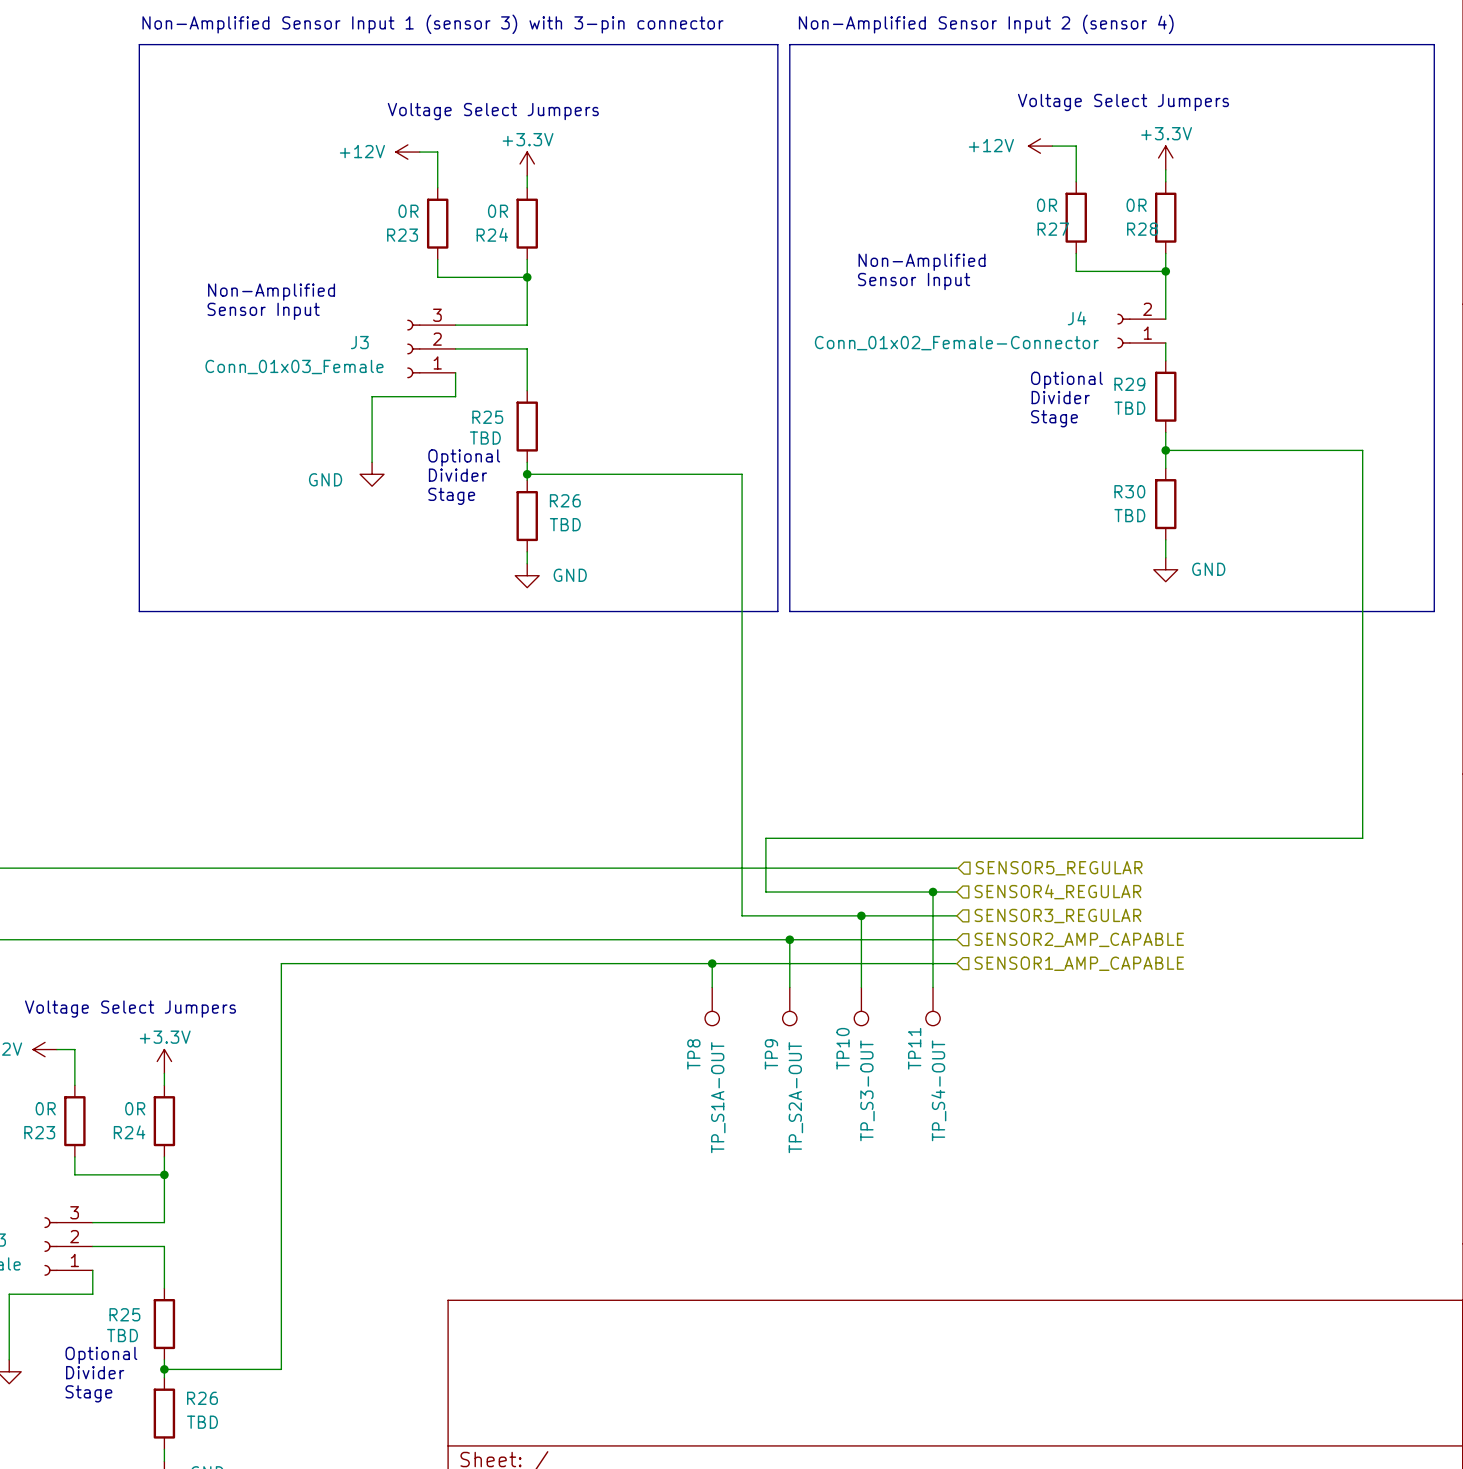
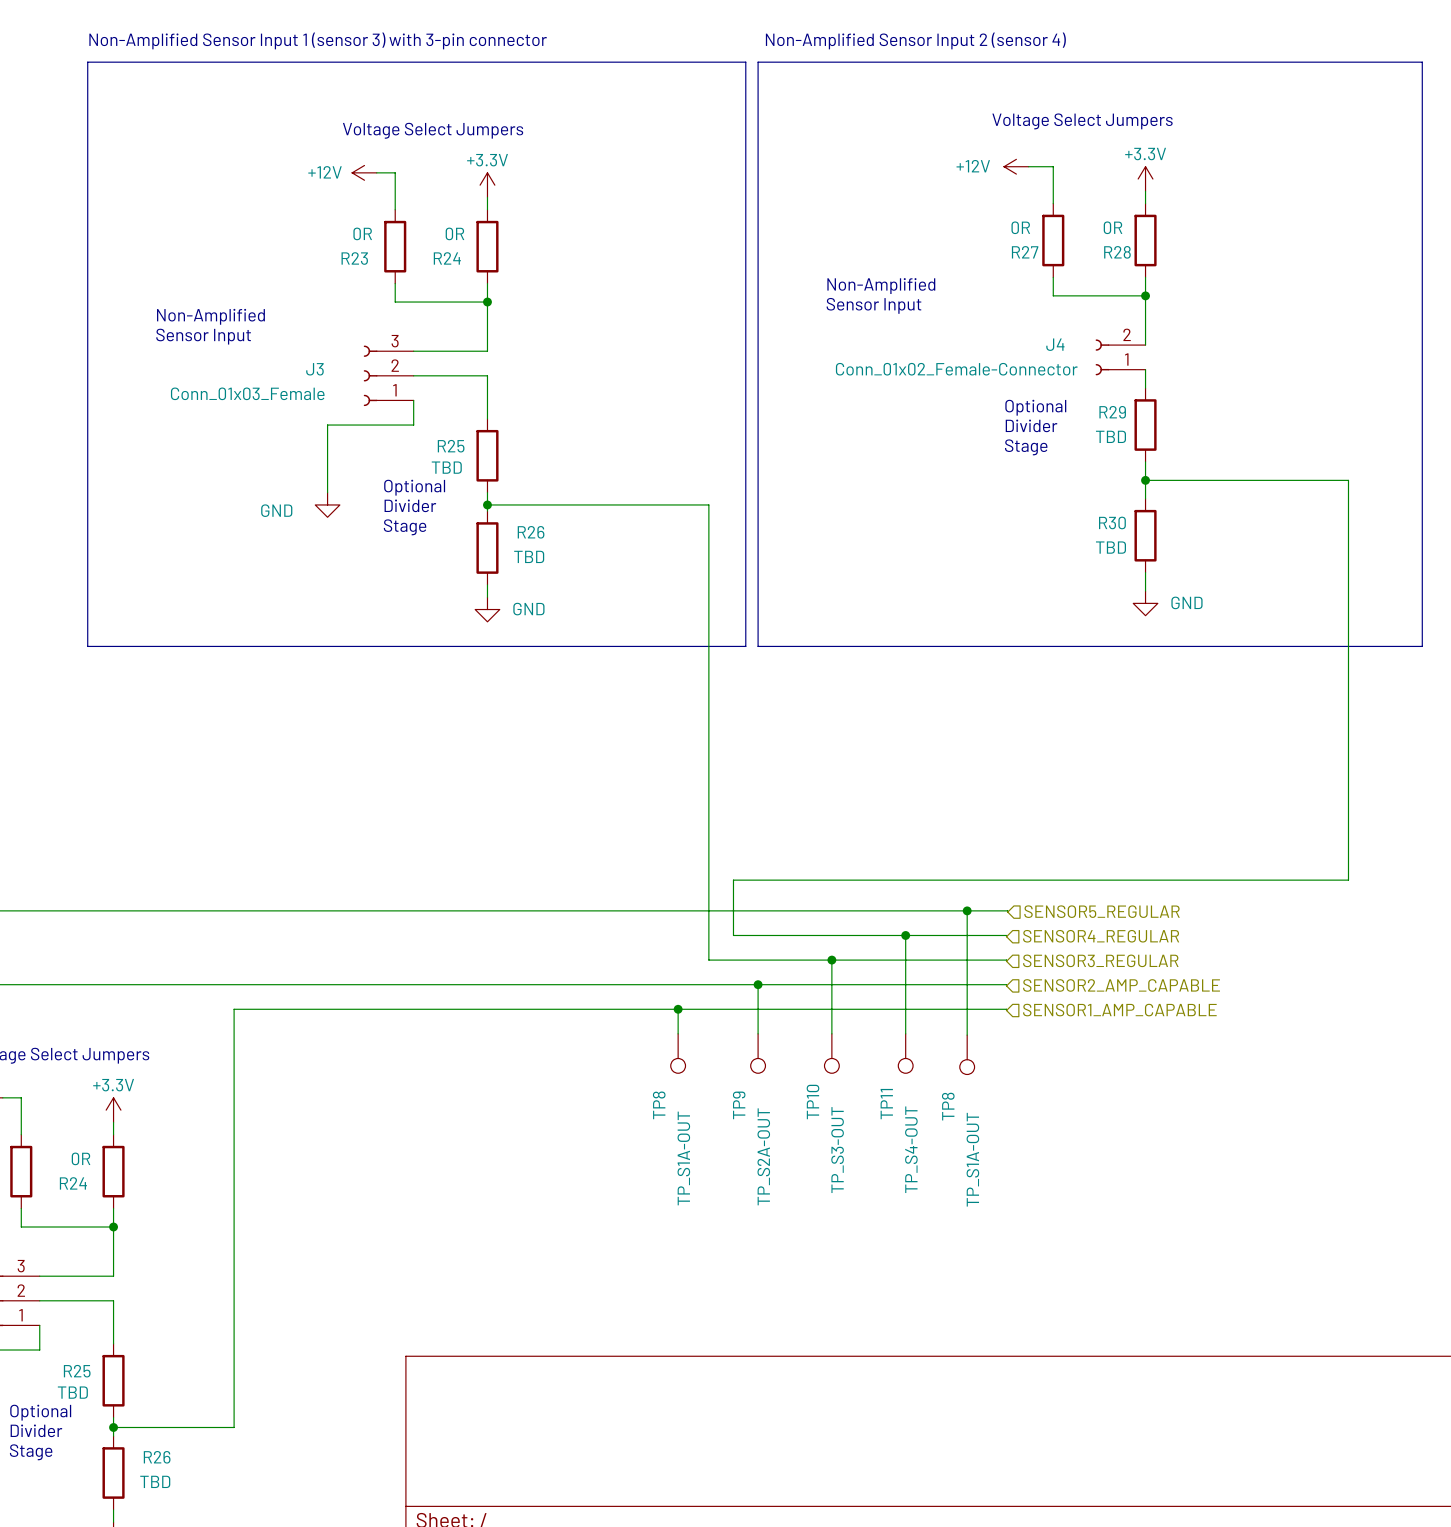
wire: none -> (930, 910) (1007, 912)
wire: none -> (967, 910) (967, 1035)
junction: none -> (967, 910)
hierarchical label position: SENSOR5_REGULAR (1059, 868) -> SENSOR5_REGULAR (1102, 911)
hierarchical label position: SENSOR4_REGULAR (1057, 891) -> SENSOR4_REGULAR (1101, 936)
wire: none -> (930, 935) (1006, 936)
wire: none -> (930, 960) (1006, 961)
hierarchical label position: SENSOR3_REGULAR (1057, 916) -> SENSOR3_REGULAR (1100, 960)
wire: none -> (930, 984) (1006, 985)
hierarchical label position: SENSOR2_AMP_CAPABLE (1079, 939) -> SENSOR2_AMP_CAPABLE (1121, 985)
wire: none -> (930, 1009) (1006, 1010)
hierarchical label position: SENSOR1_AMP_CAPABLE (1079, 963) -> SENSOR1_AMP_CAPABLE (1119, 1010)
TP8: none -> TP_S1A-OUT (967, 1054)

